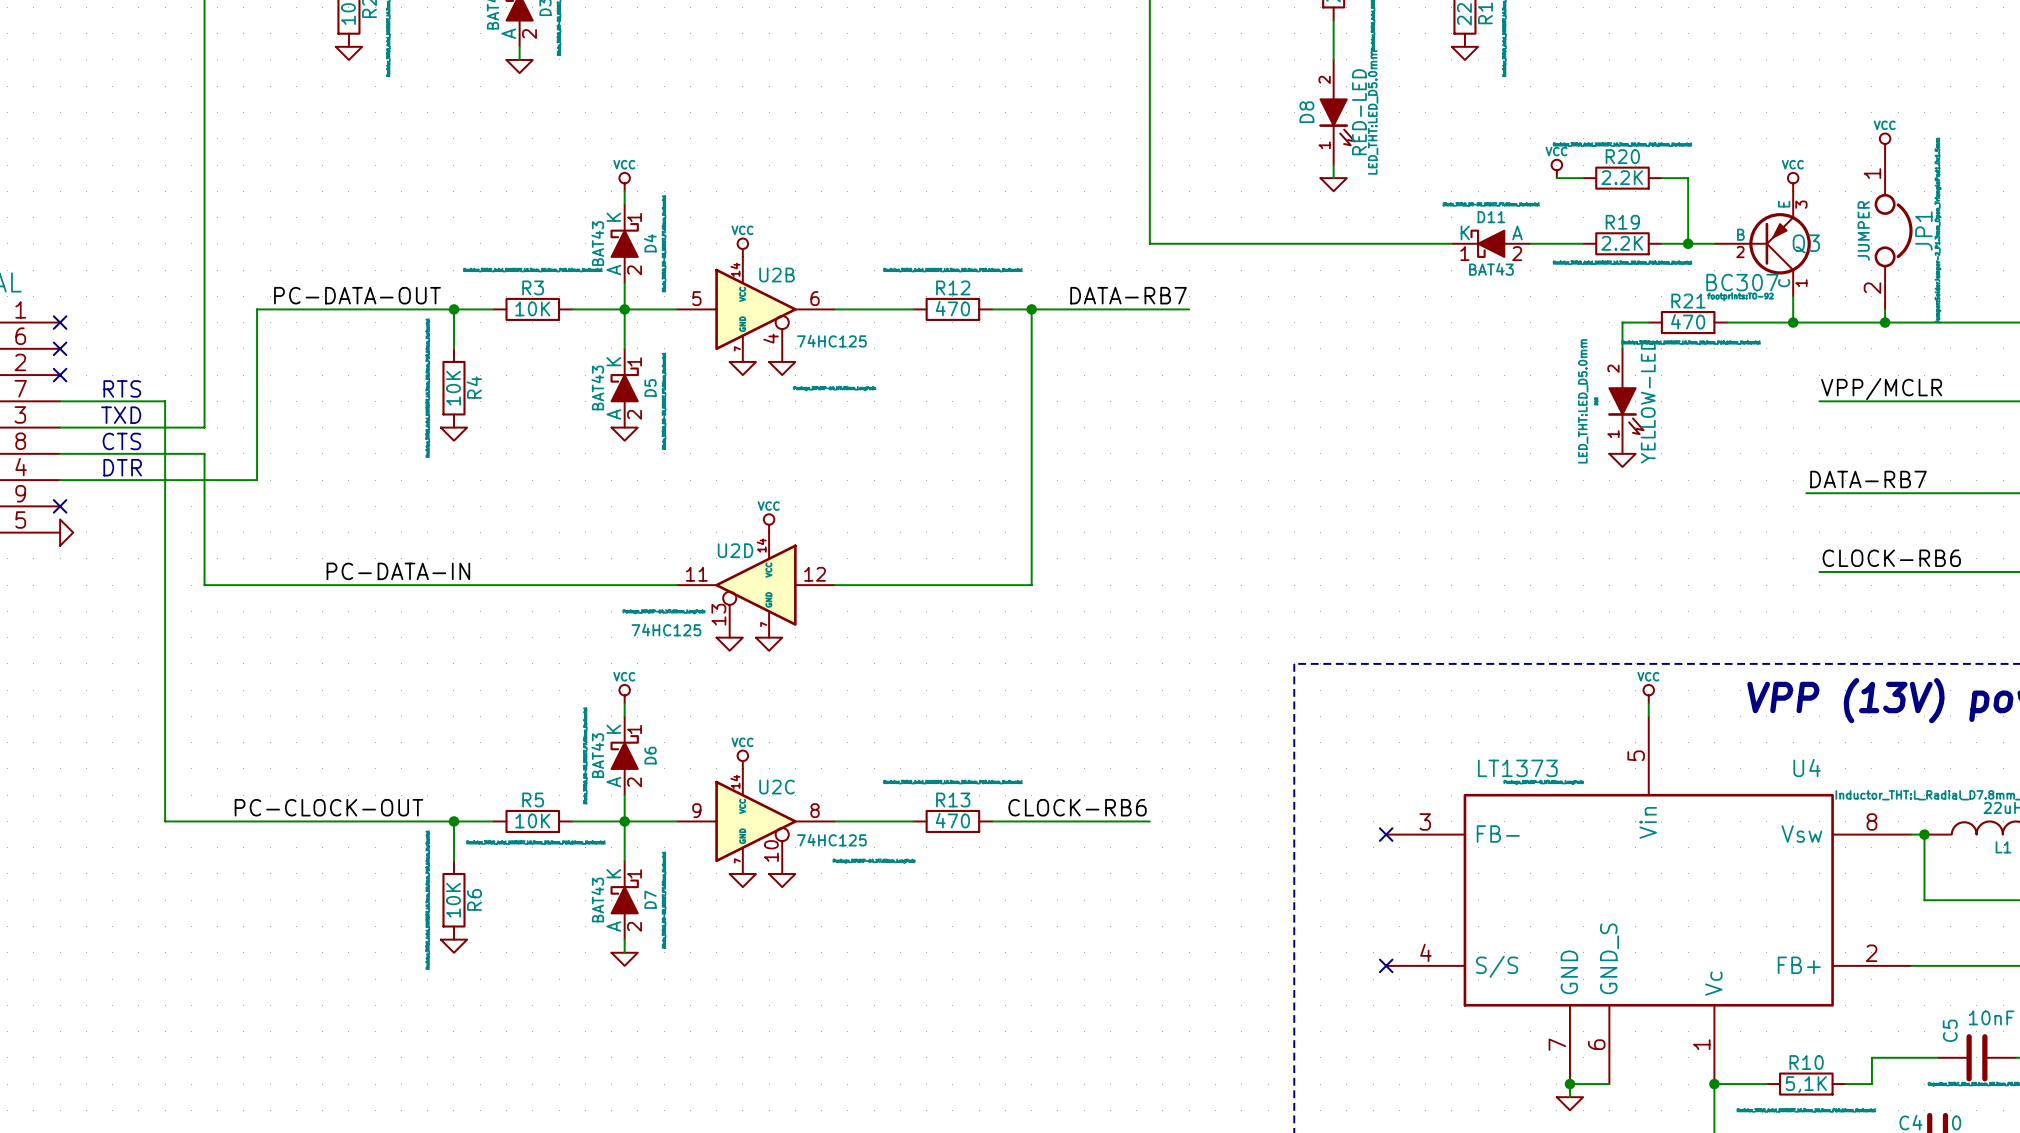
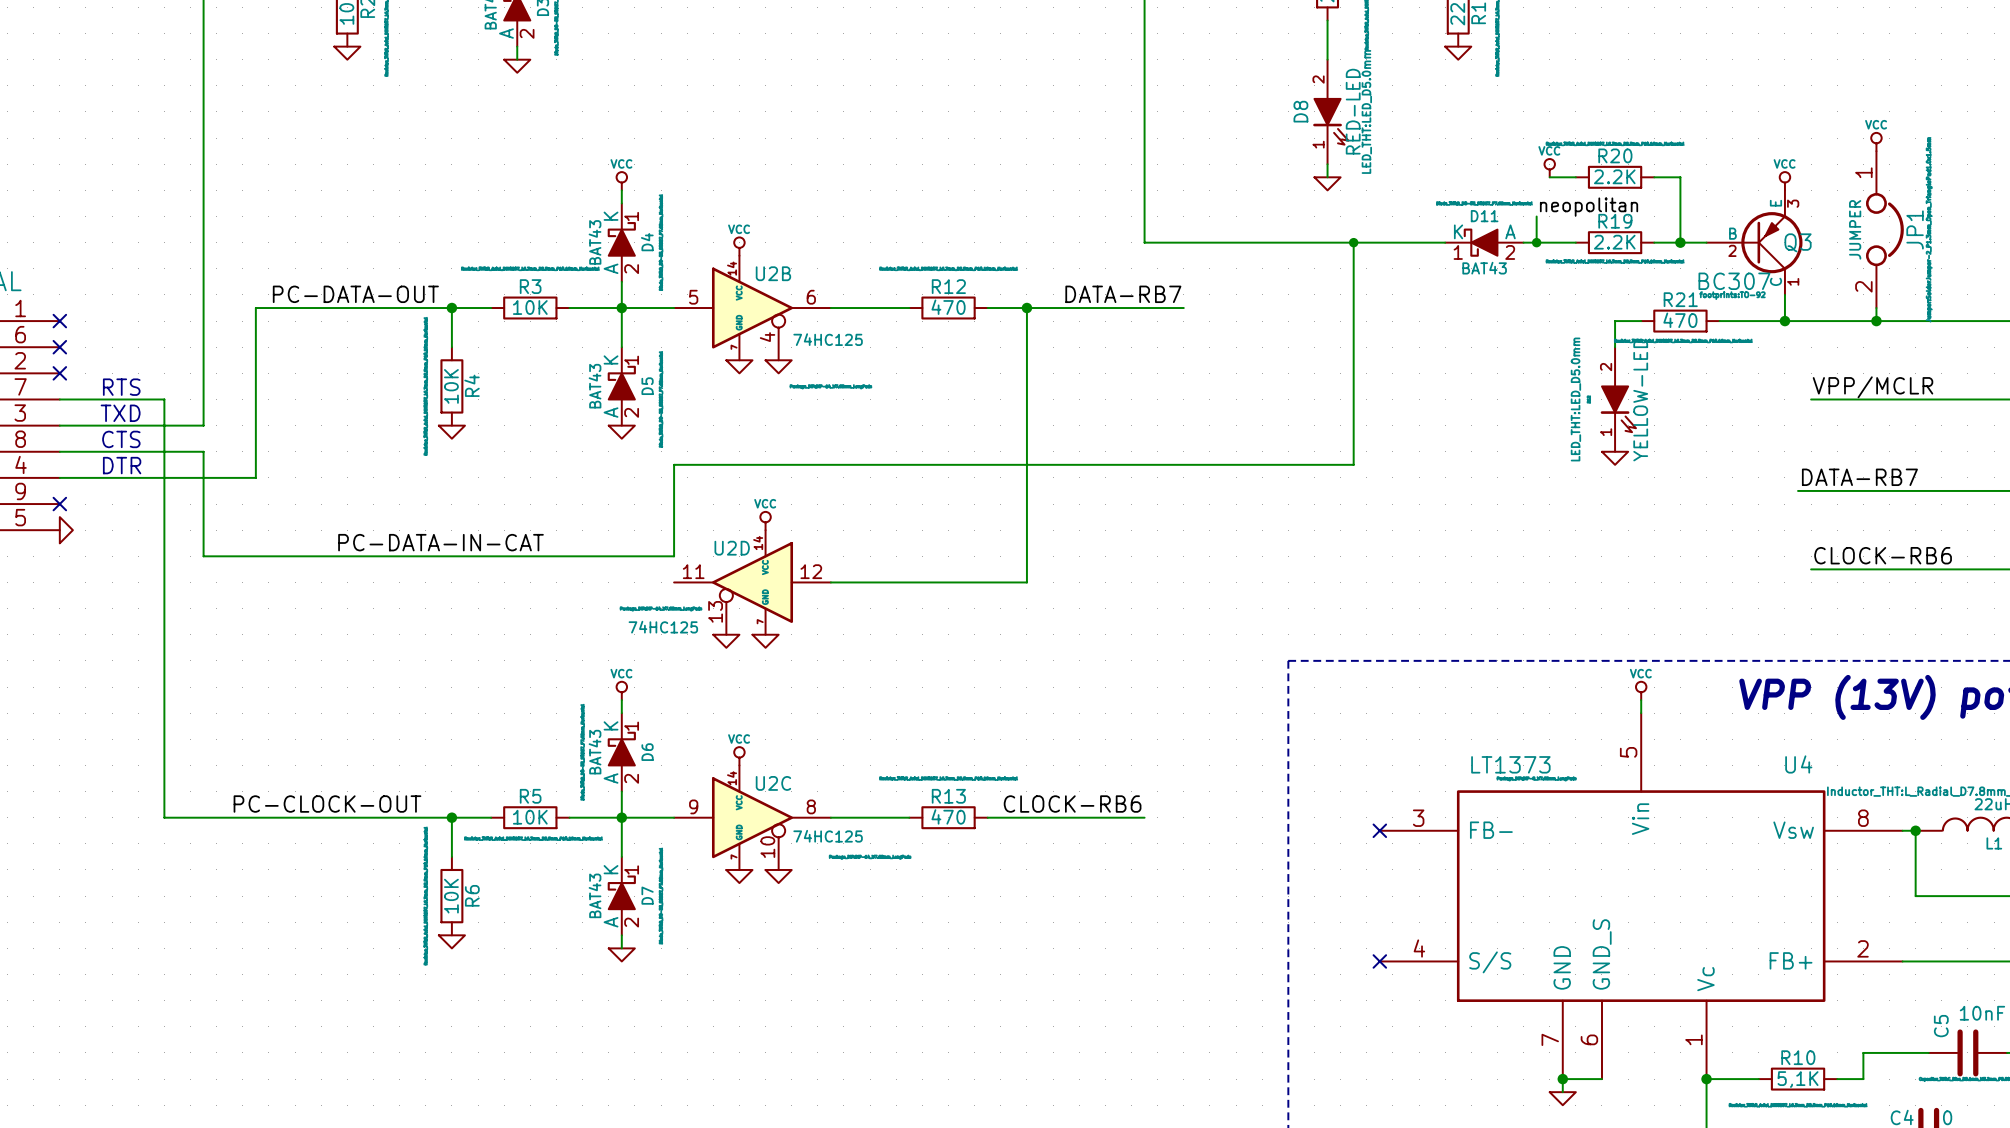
label: none -> neopolitan (1589, 207)
wire: none -> (1536, 216) (1536, 242)
junction: none -> (1353, 242)
junction: none -> (1536, 242)
wire: (204, 558) (204, 585) (677, 585) -> (203, 556) (674, 556) (674, 464) (1353, 464) (1353, 242)
label: PC-DATA-IN (398, 571) -> PC-DATA-IN-CAT (440, 542)

